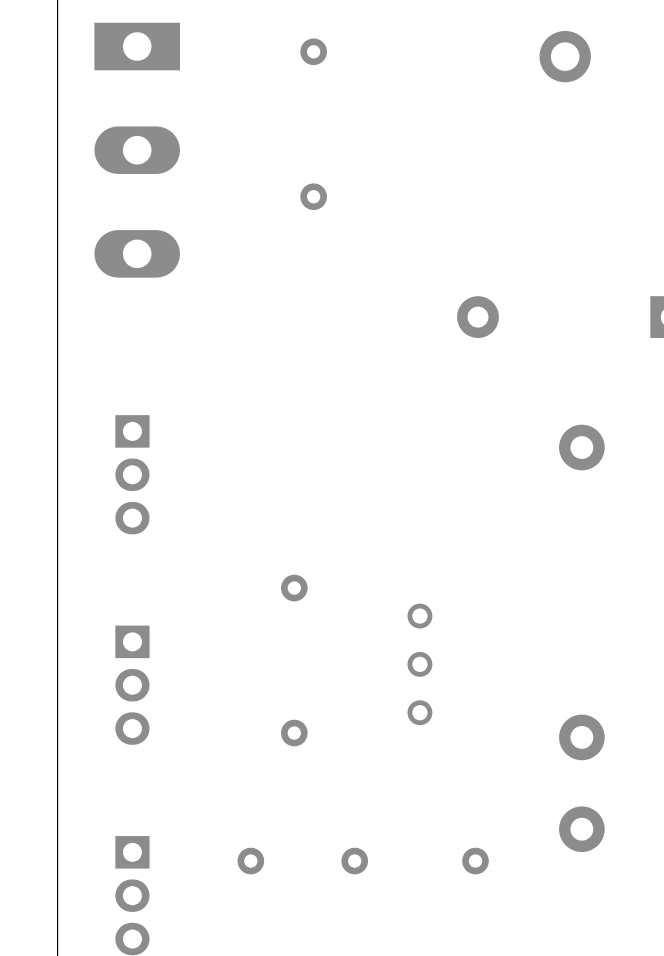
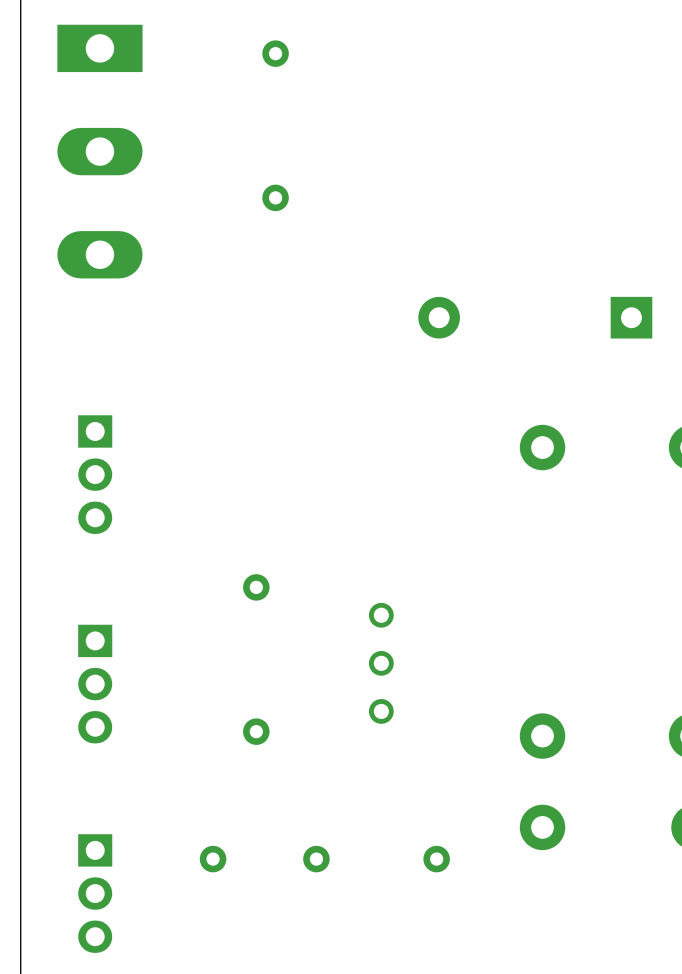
part: (565, 56) -> none

